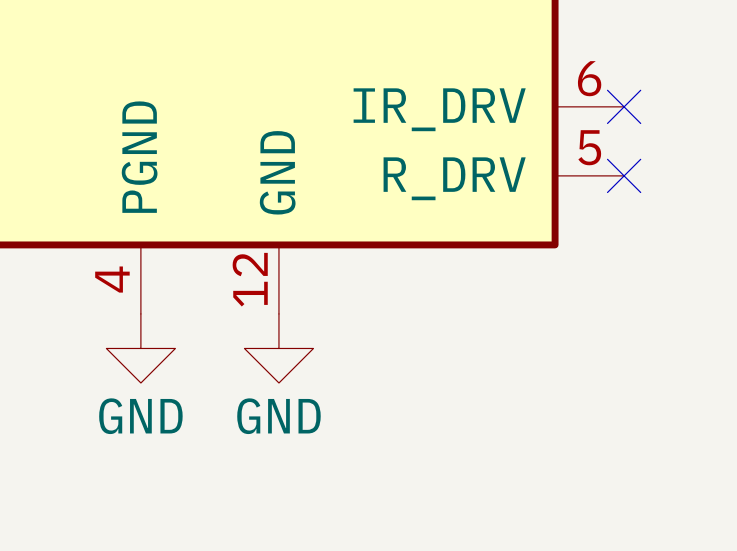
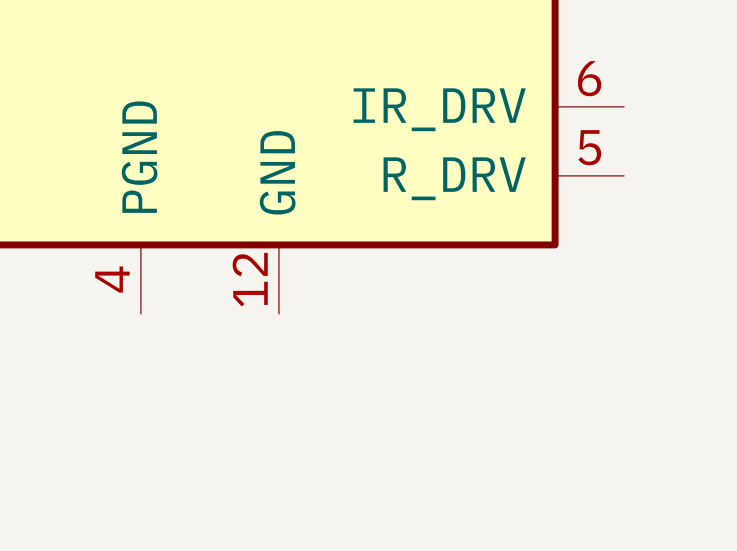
no-connect mark: (624, 106) -> none
no-connect mark: (624, 175) -> none
power symbol: GND (140, 348) -> none
power symbol: GND (278, 348) -> none

